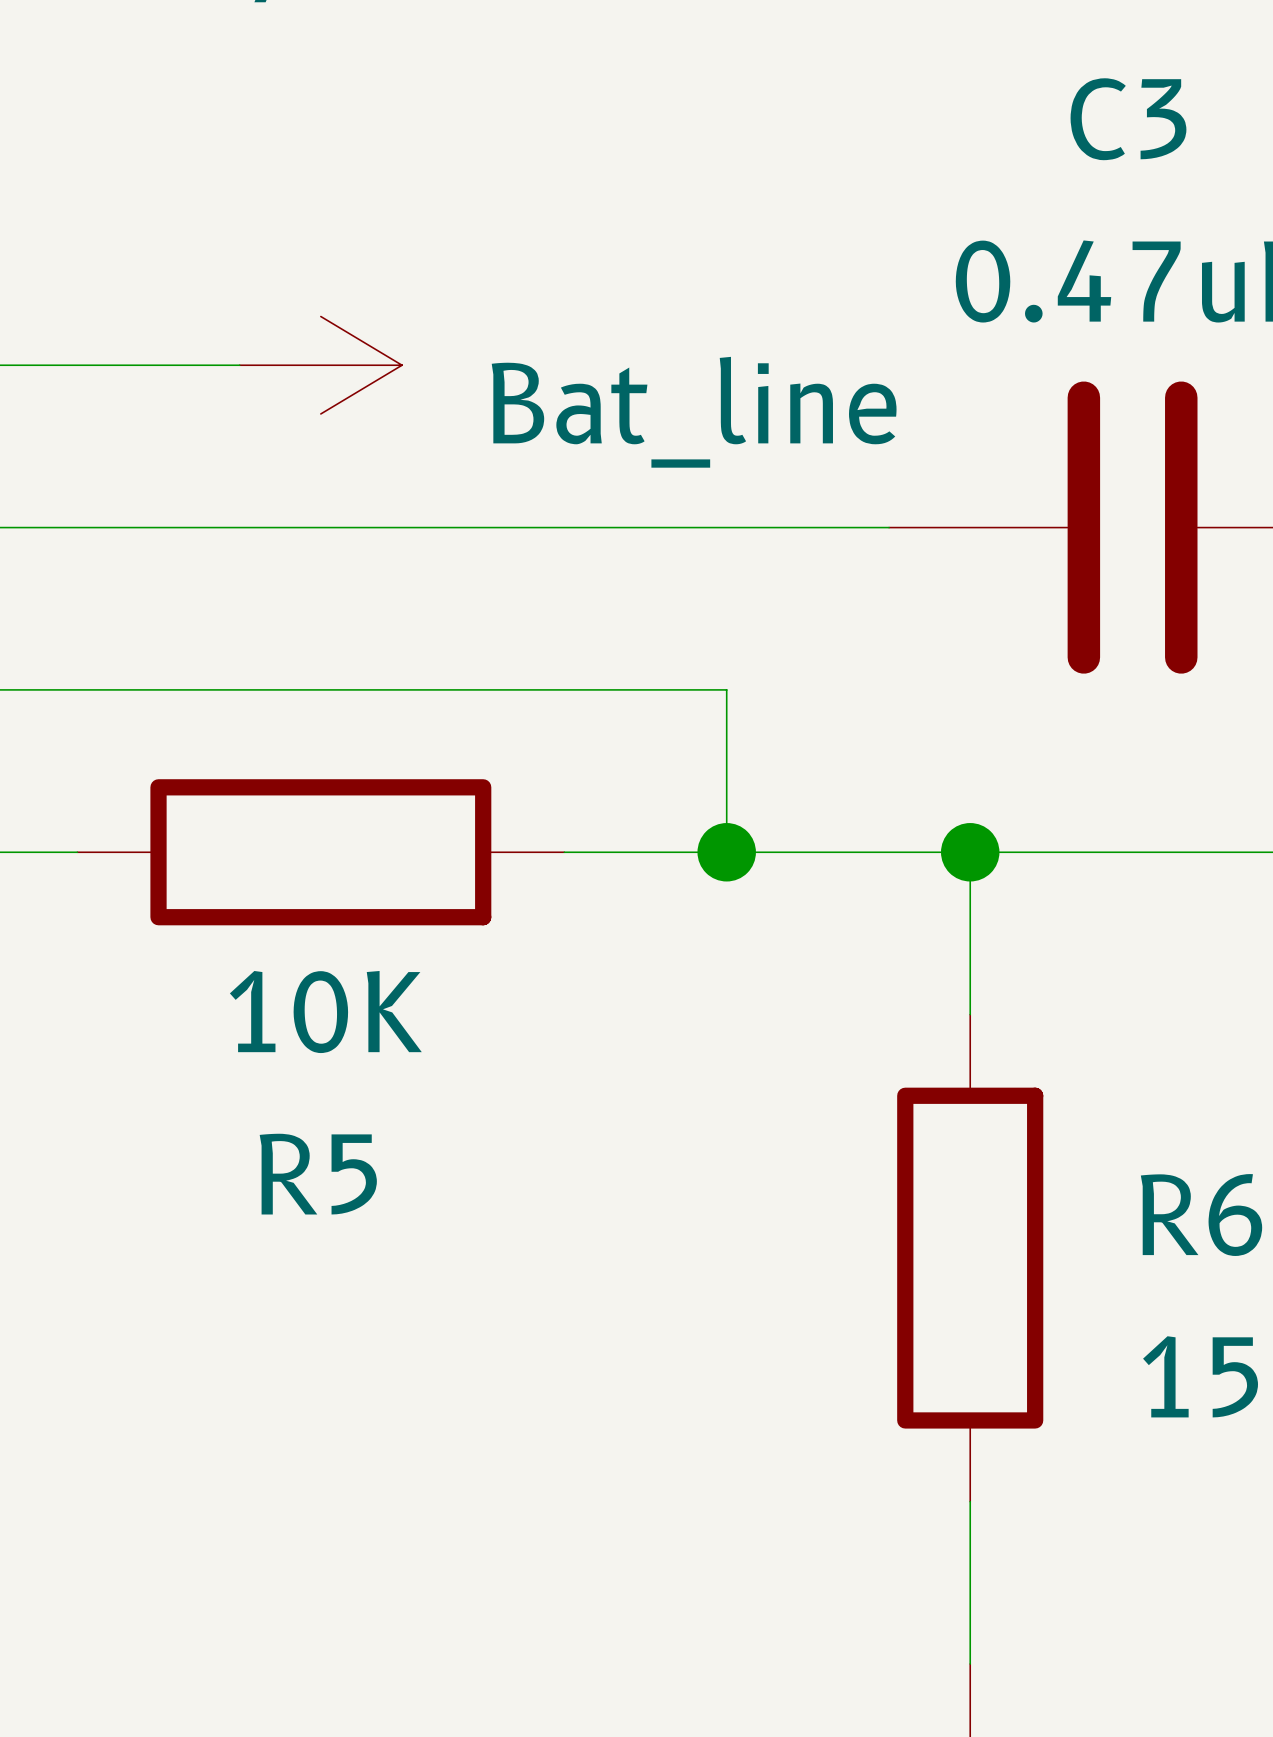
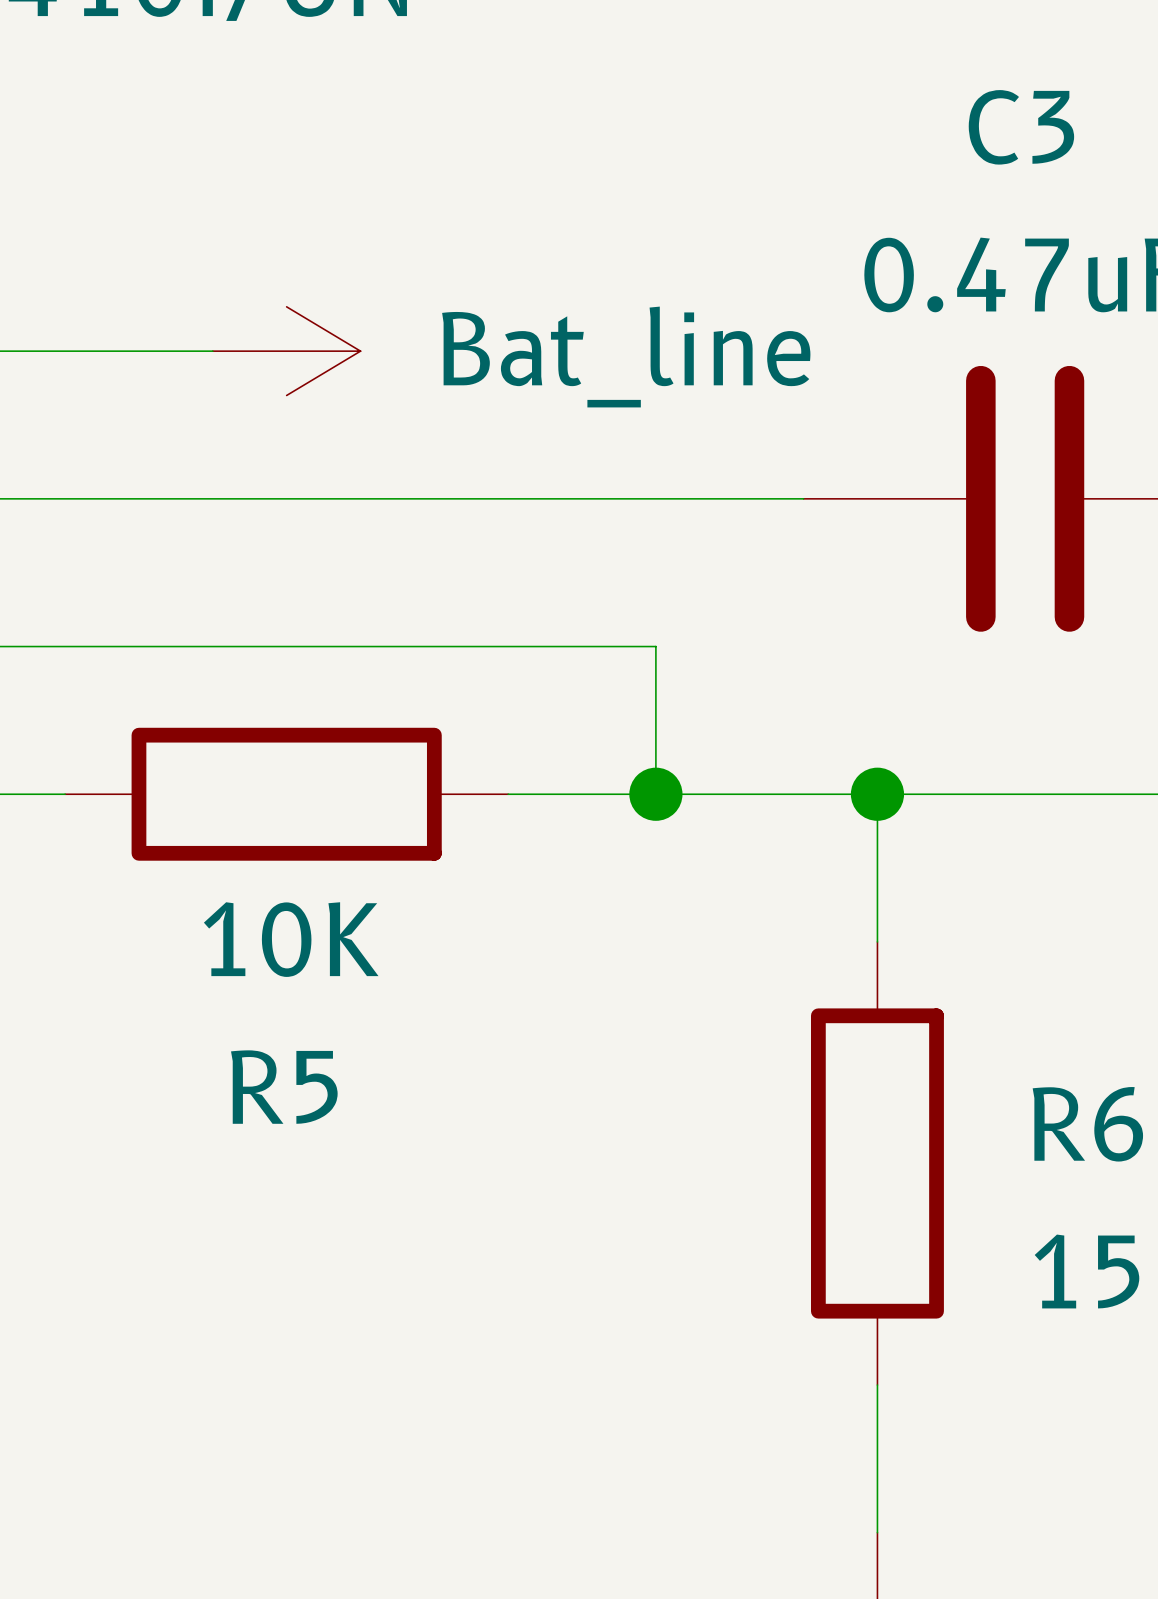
power symbol text position: Bat_line (694, 412) -> Bat_line (626, 357)

